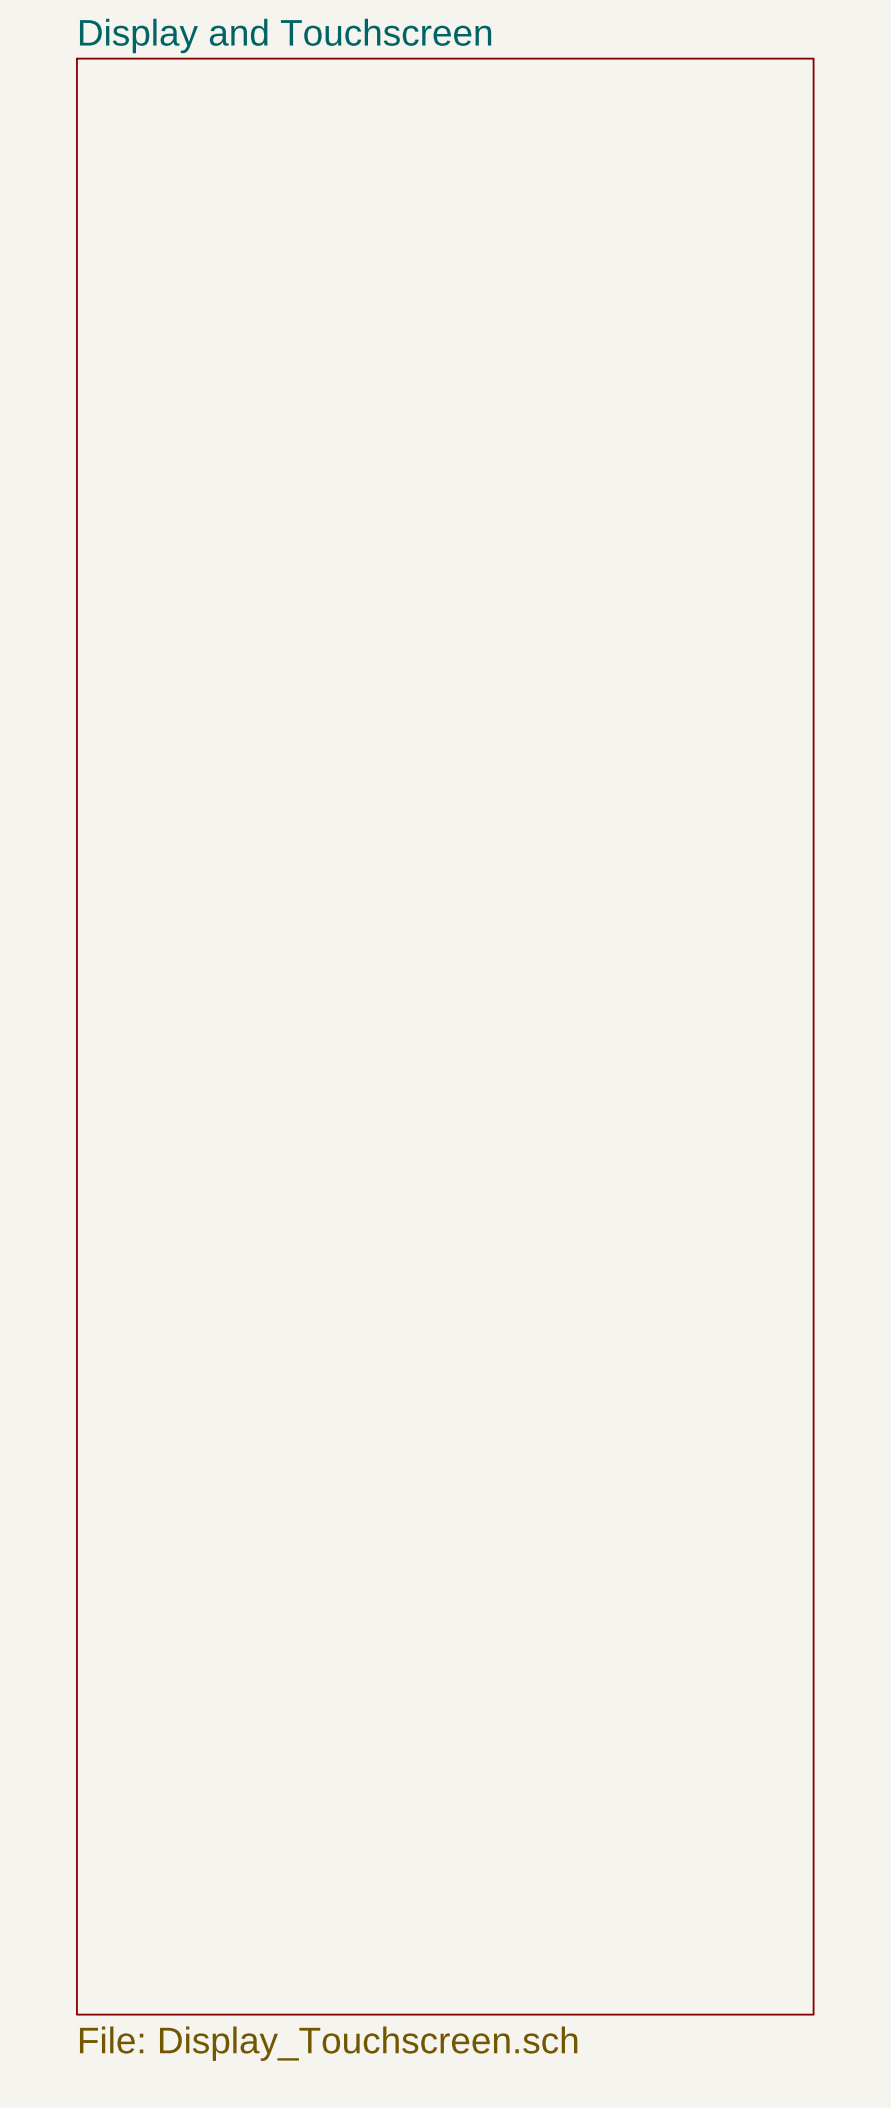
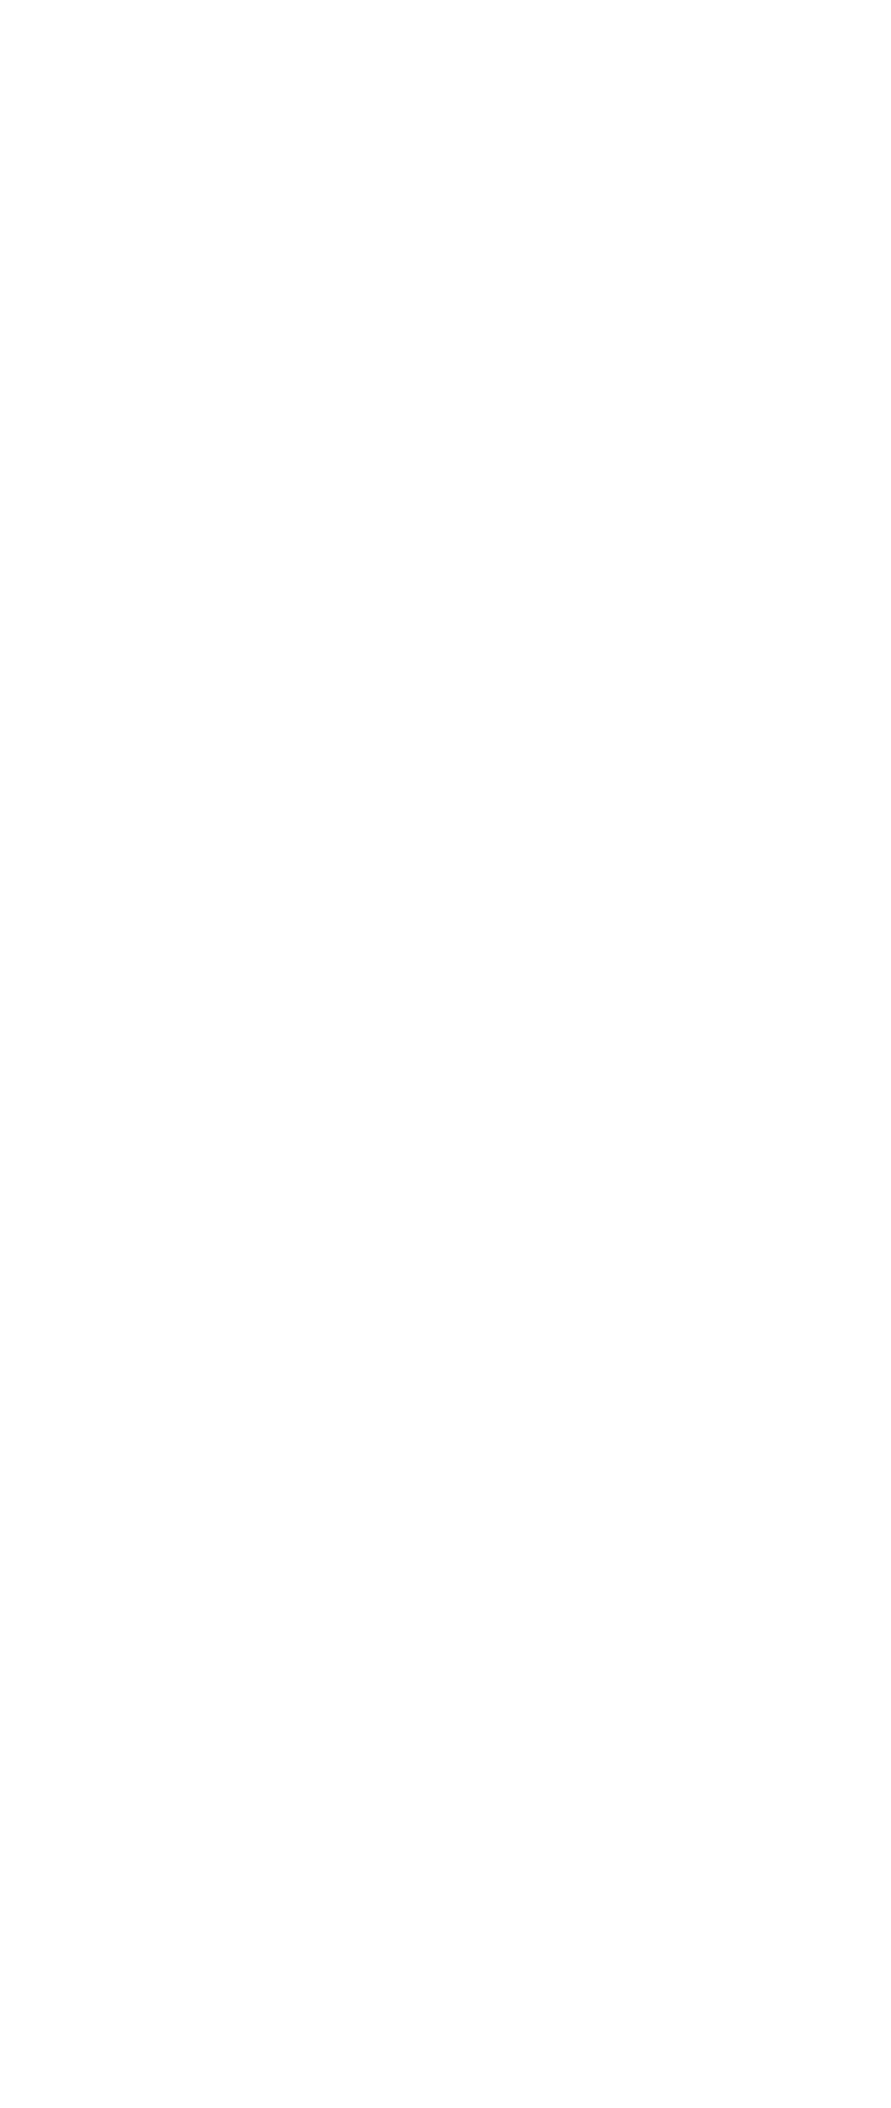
sheet Display and Touchscreen: File: Display_Touchscreen.sch (445, 1036) -> none

